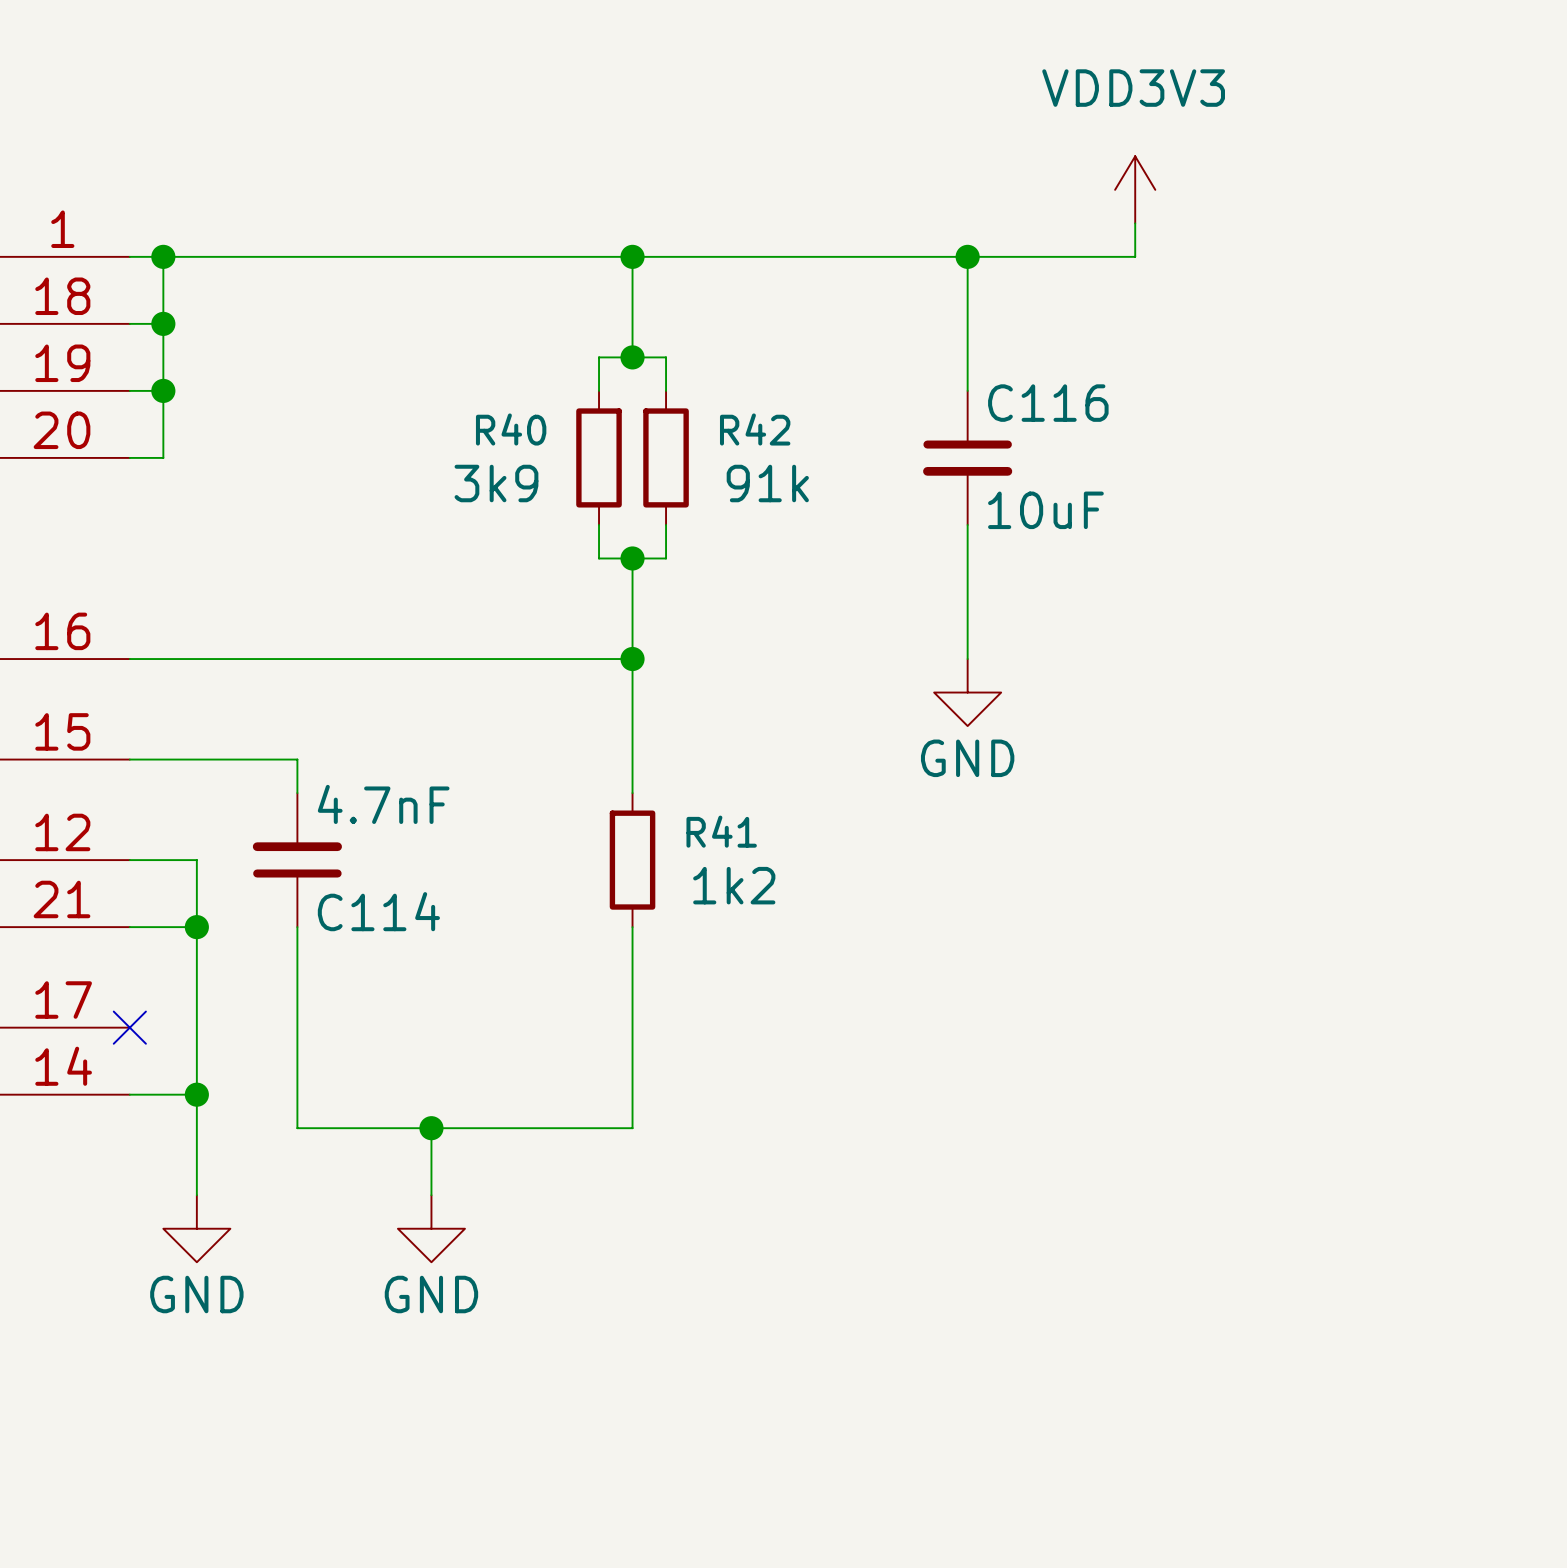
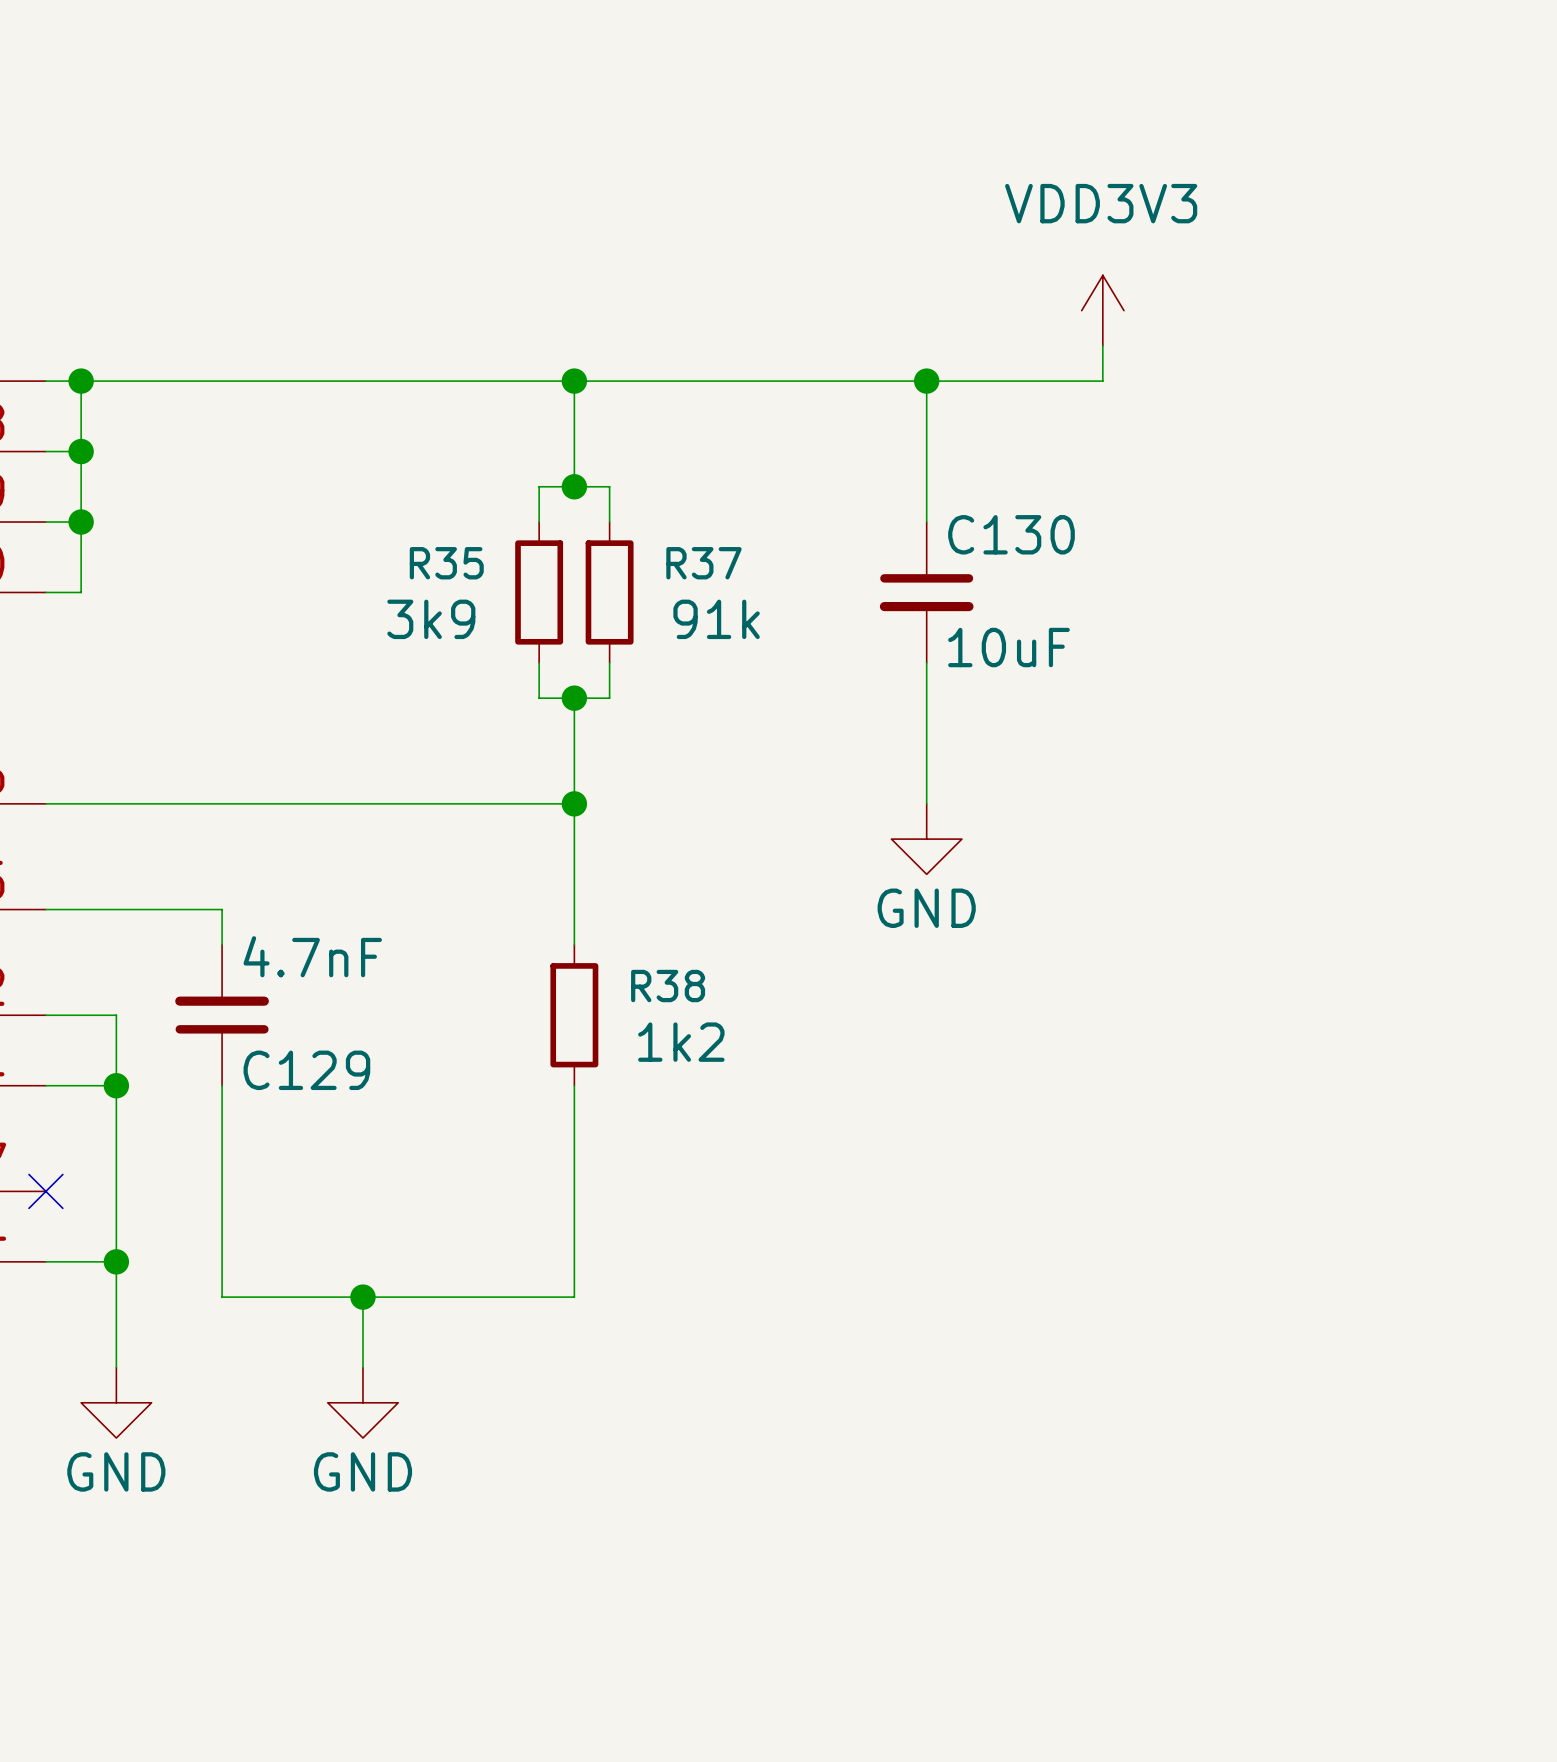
C116 name: C116 (1048, 403) -> C130 (1011, 534)
R40 name: R40 (511, 429) -> R35 (446, 563)
R42 name: R42 (755, 429) -> R37 (703, 563)
R41 name: R41 (721, 831) -> R38 (668, 986)
C114 name: C114 (378, 911) -> C129 (306, 1070)

